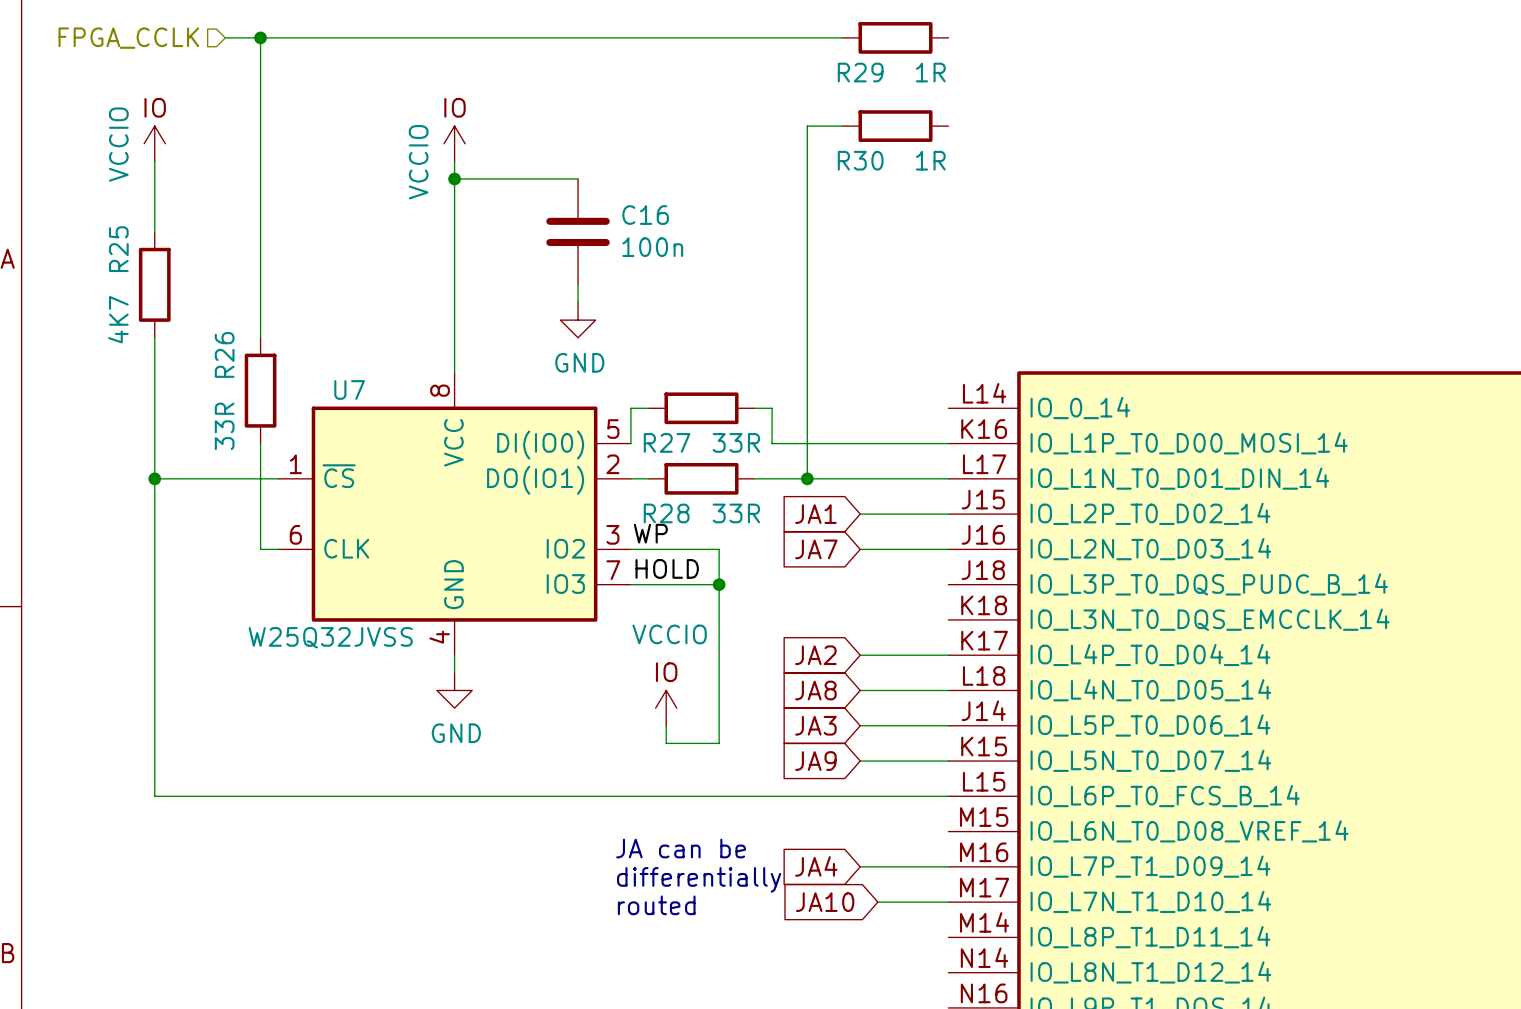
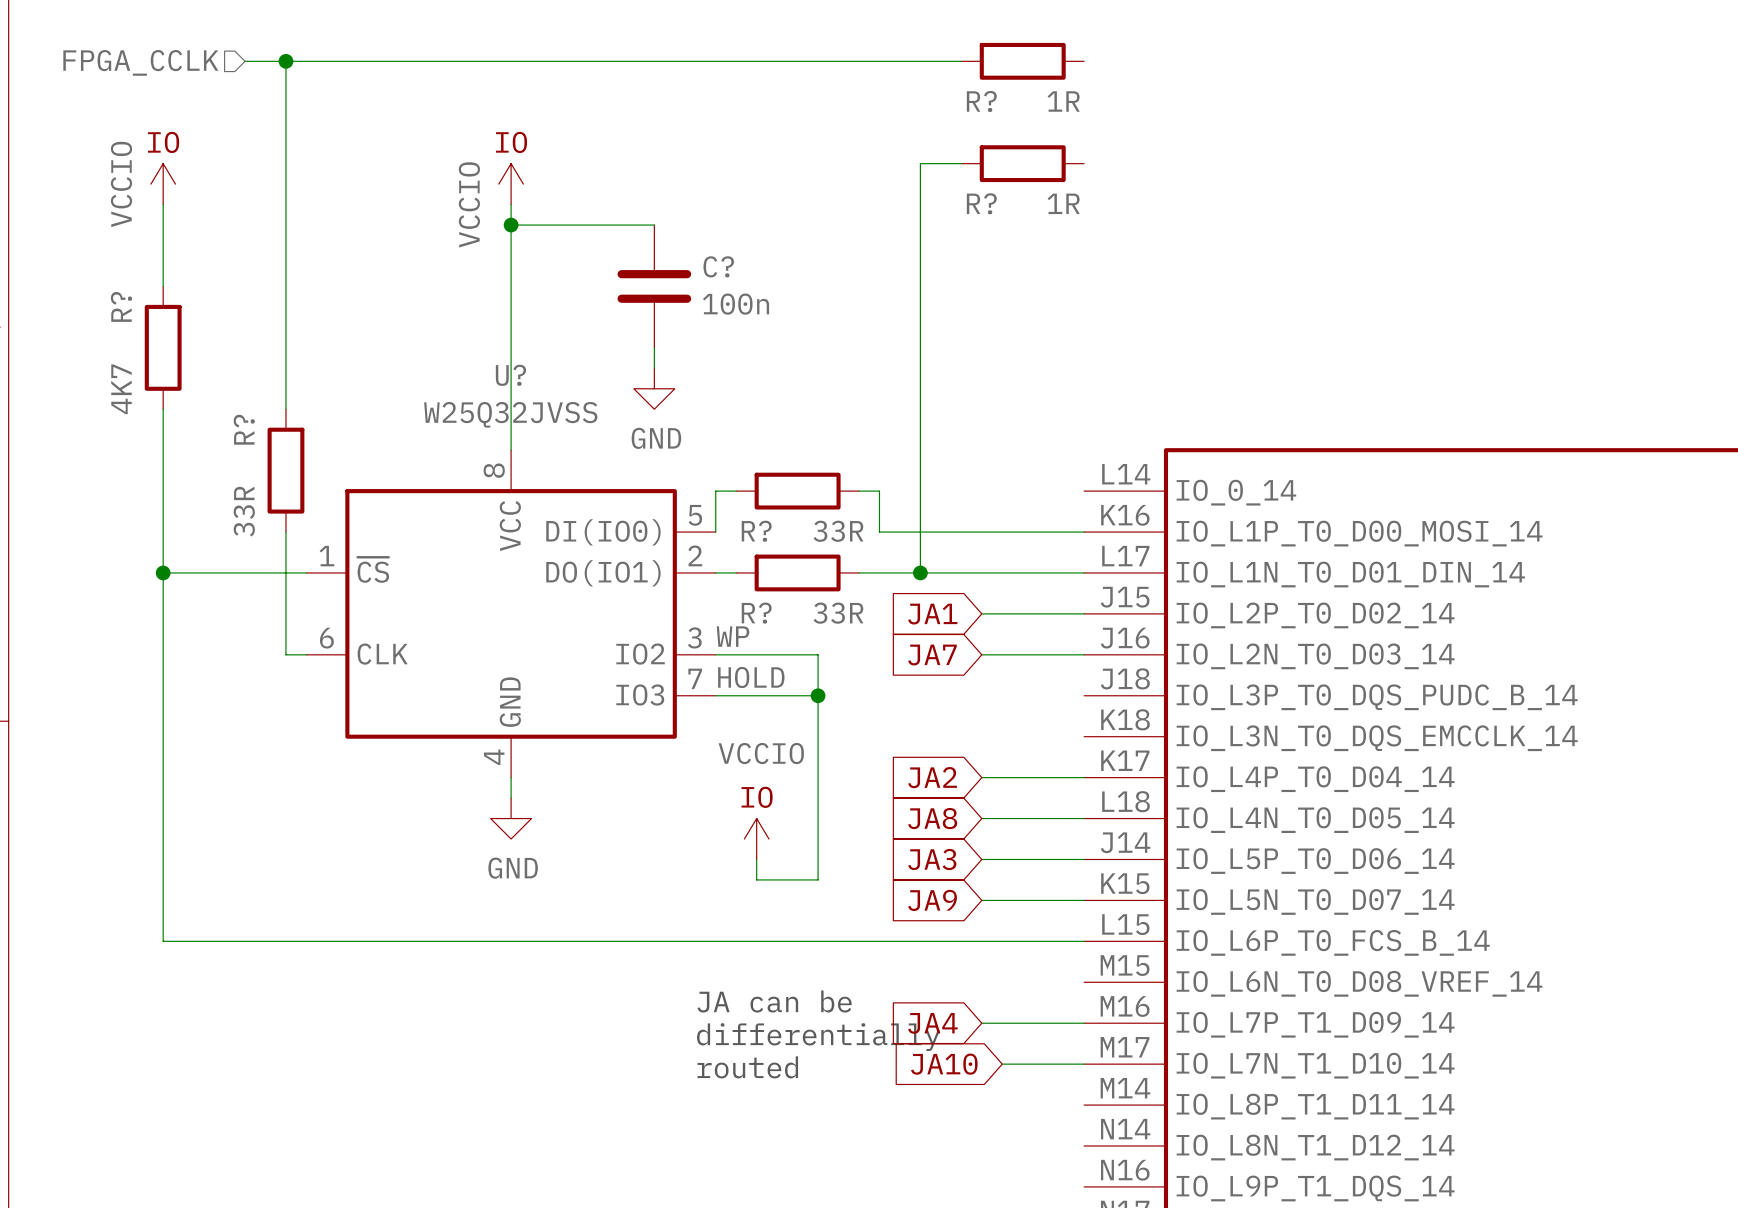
R29 name: R29 (860, 72) -> R? (981, 101)
R30 name: R30 (860, 160) -> R? (981, 203)
C16 name: C16 (645, 215) -> C? (718, 266)
R25 name: R25 (118, 249) -> R? (121, 306)
R26 name: R26 (224, 354) -> R? (244, 429)
U7 name: U7 (349, 389) -> U? (510, 375)
R27 name: R27 (667, 442) -> R? (756, 531)
R28 name: R28 (666, 513) -> R? (756, 613)
U7 value position: W25Q32JVSS (330, 637) -> W25Q32JVSS (510, 414)

